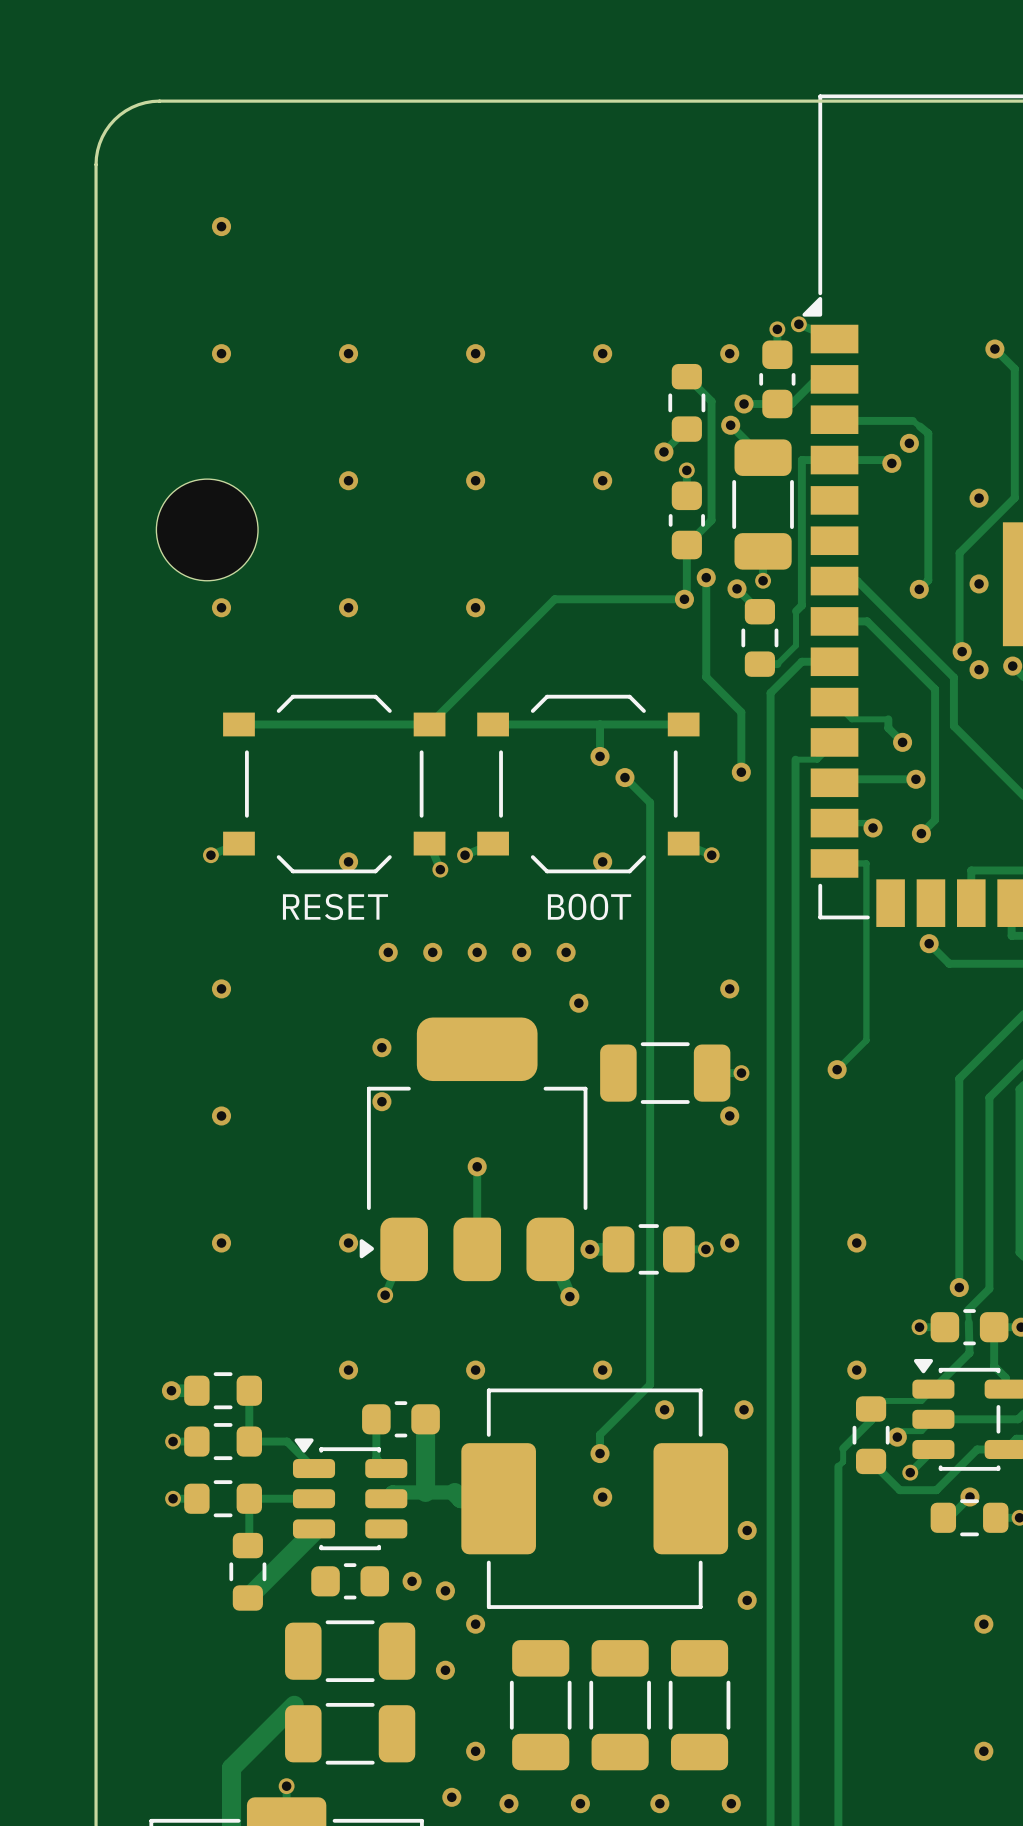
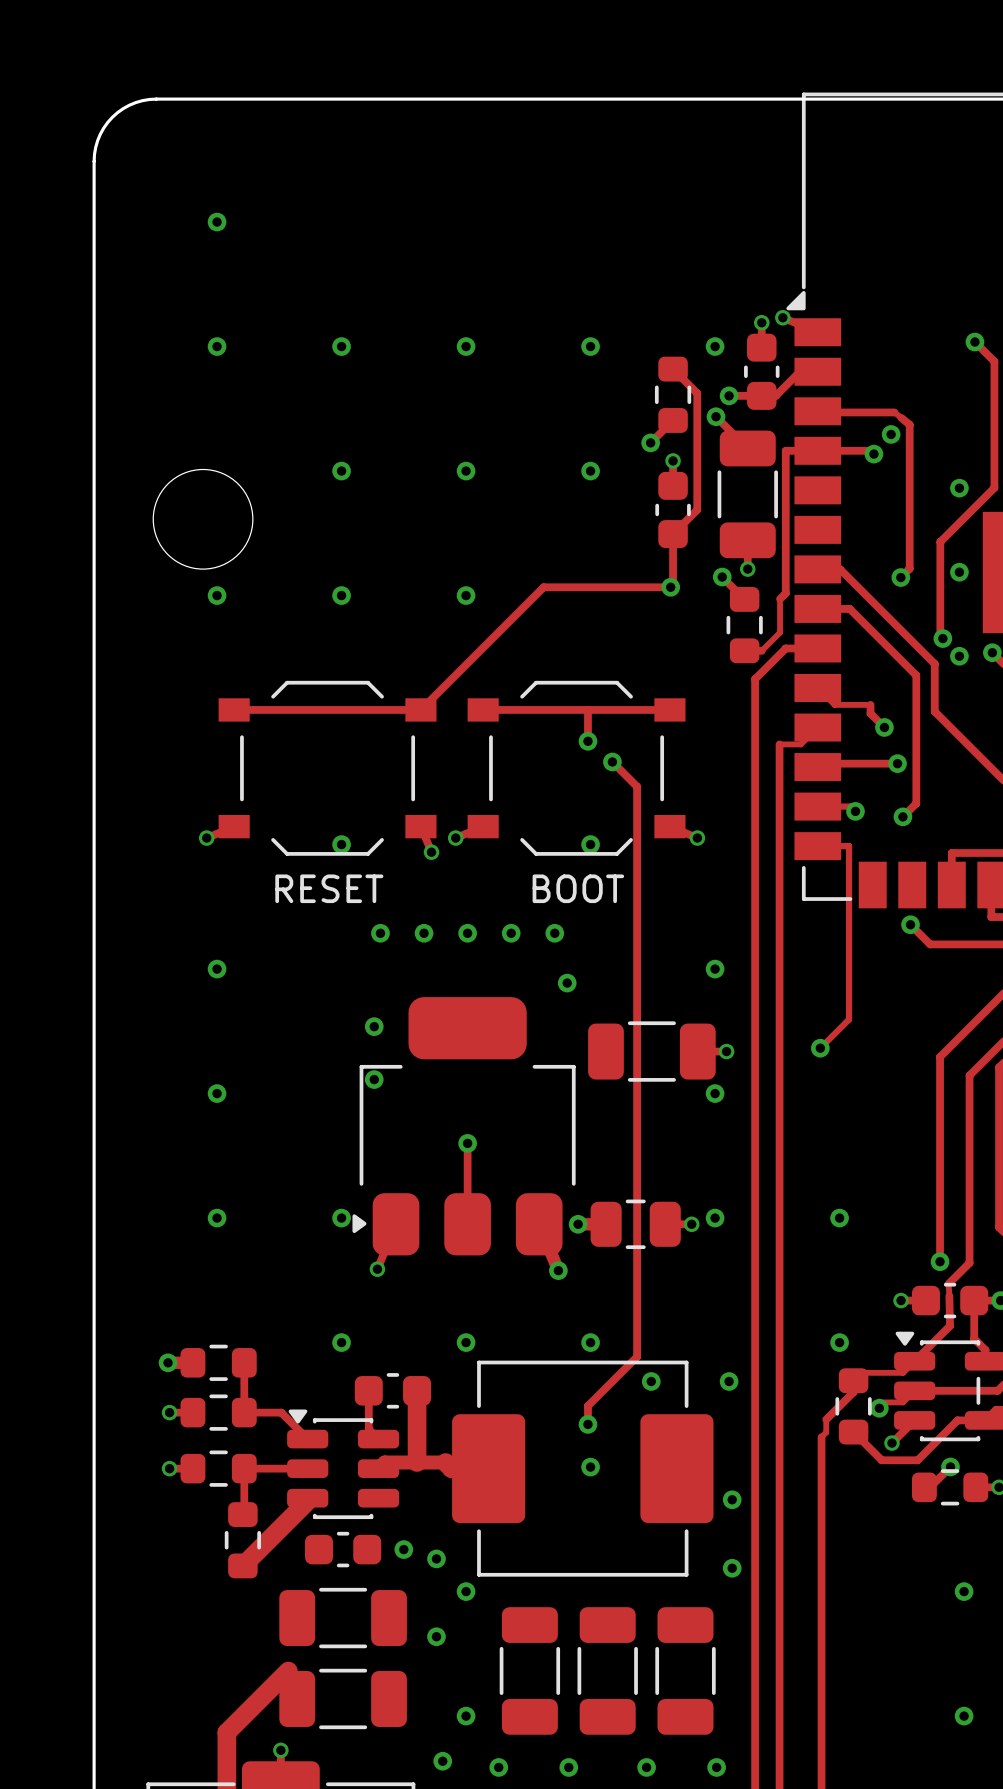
track: (706, 577) (706, 677) (741, 712) (741, 772) -> none
via: (706, 577) -> none
via: (741, 772) -> none

